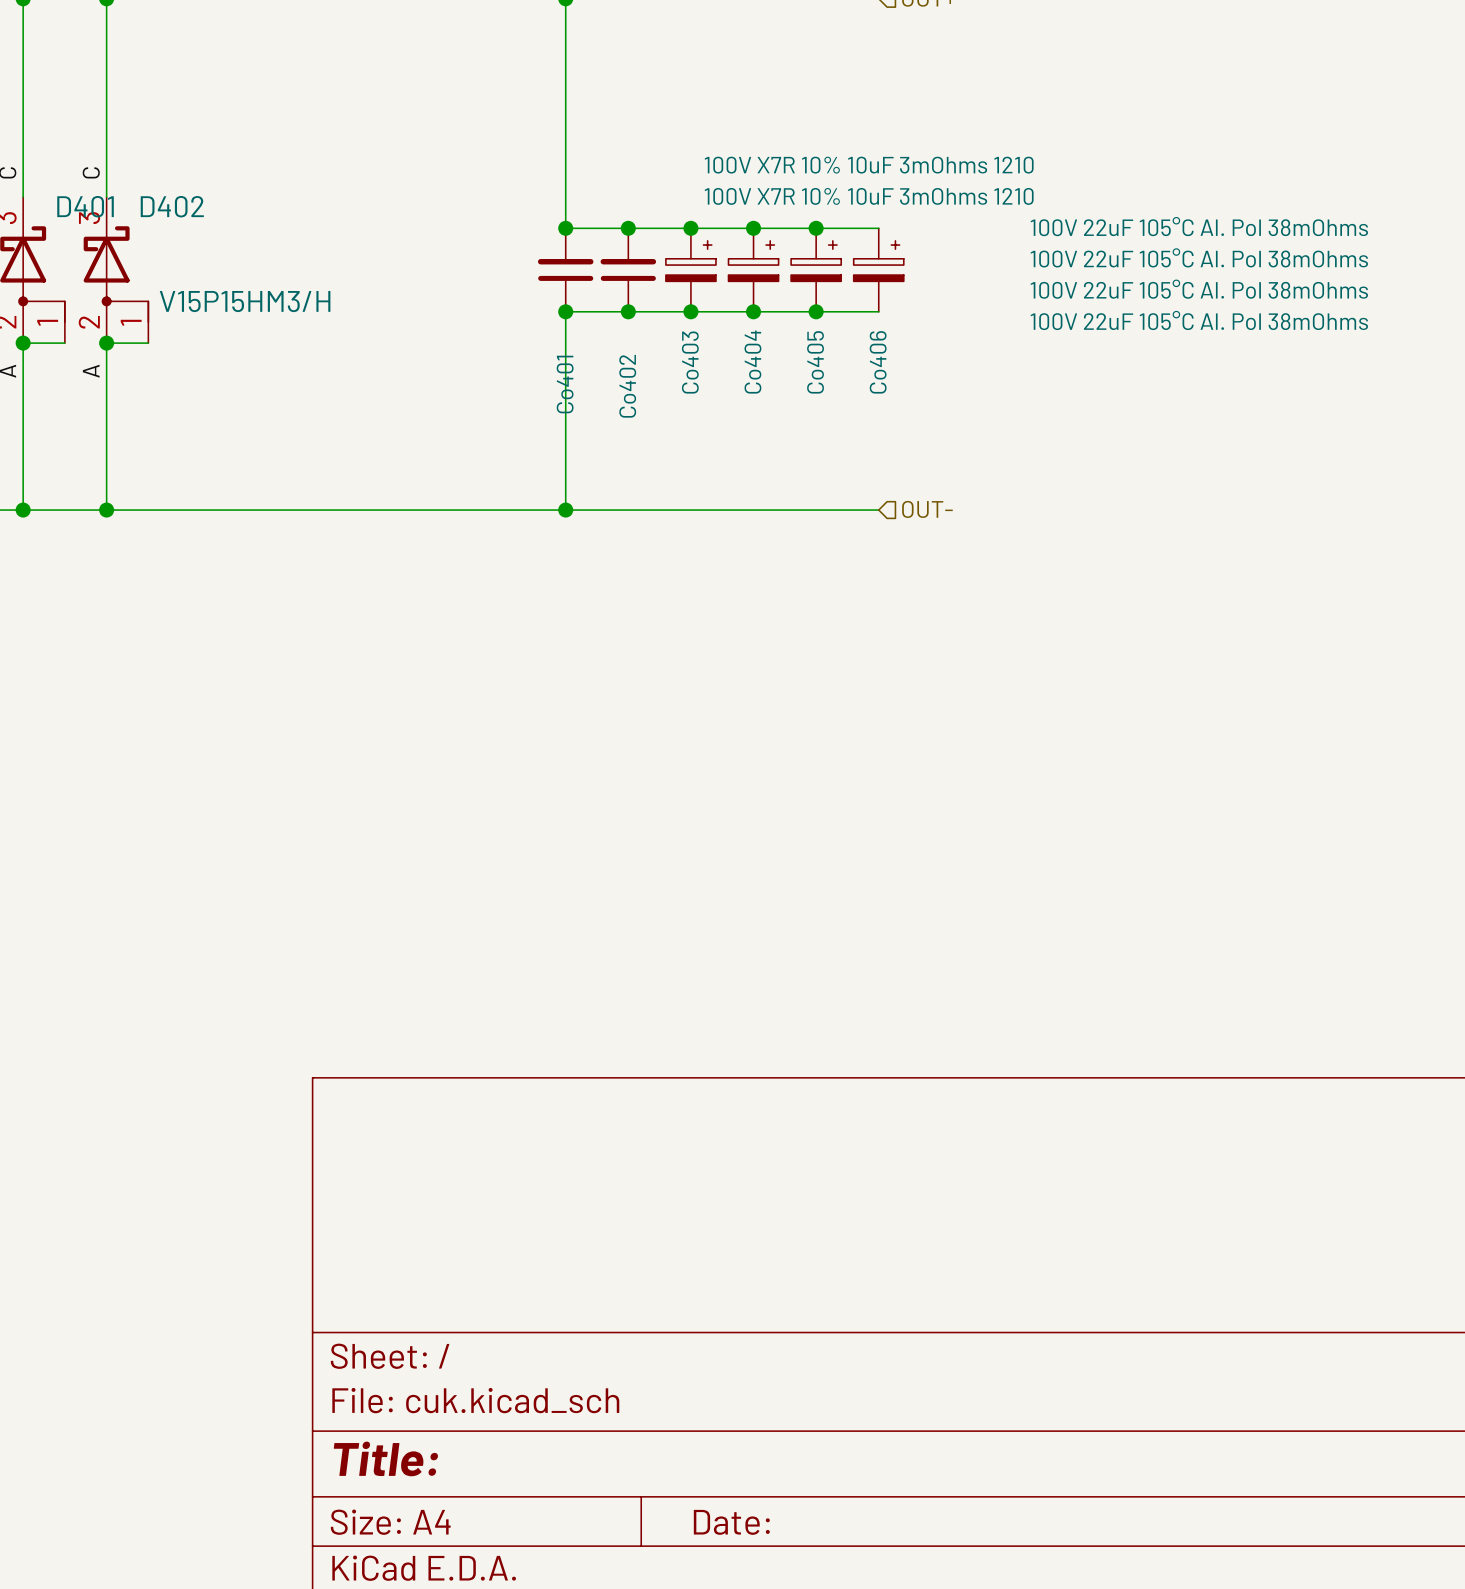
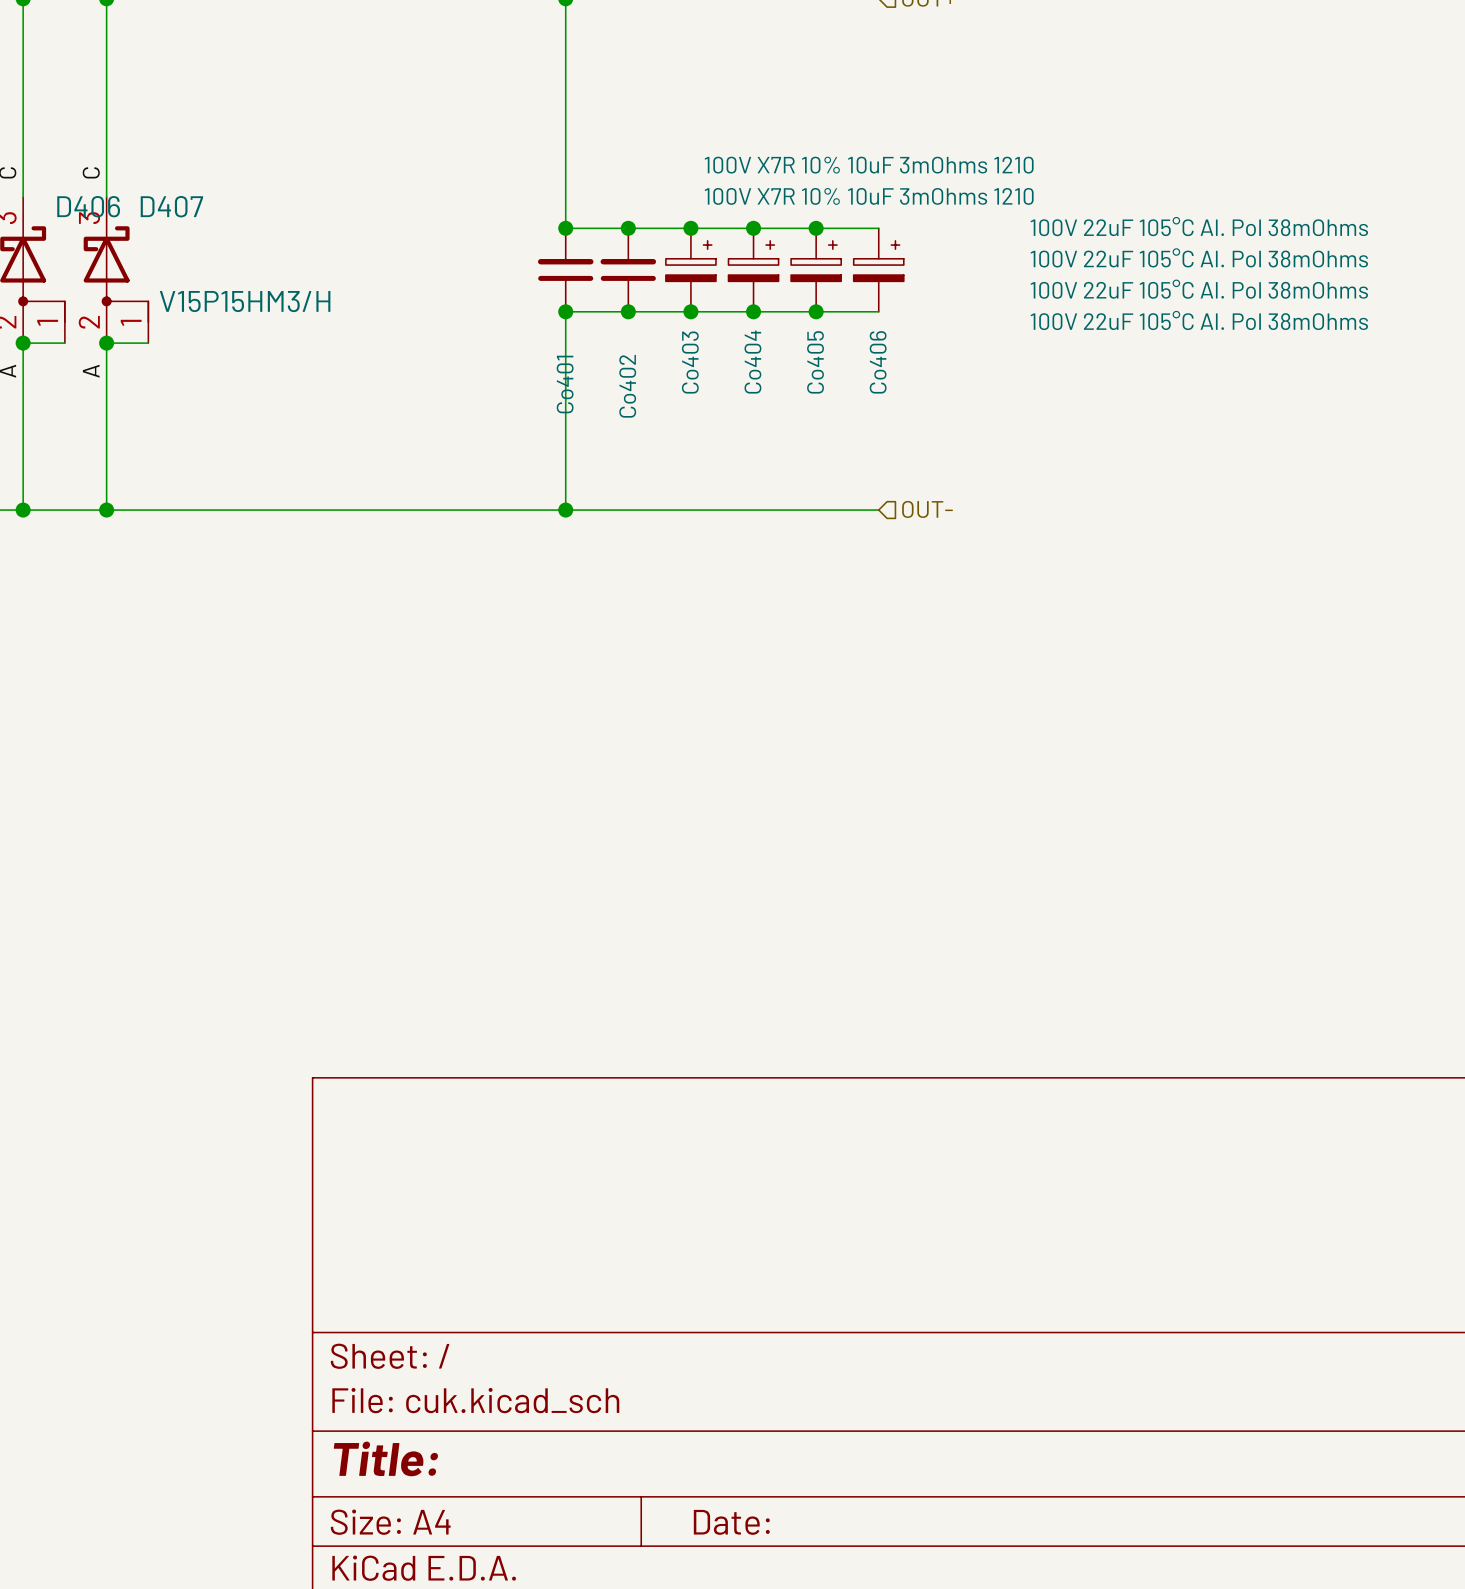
D401 name: D401 (85, 206) -> D406 (88, 206)
D402 name: D402 (172, 206) -> D407 (171, 206)

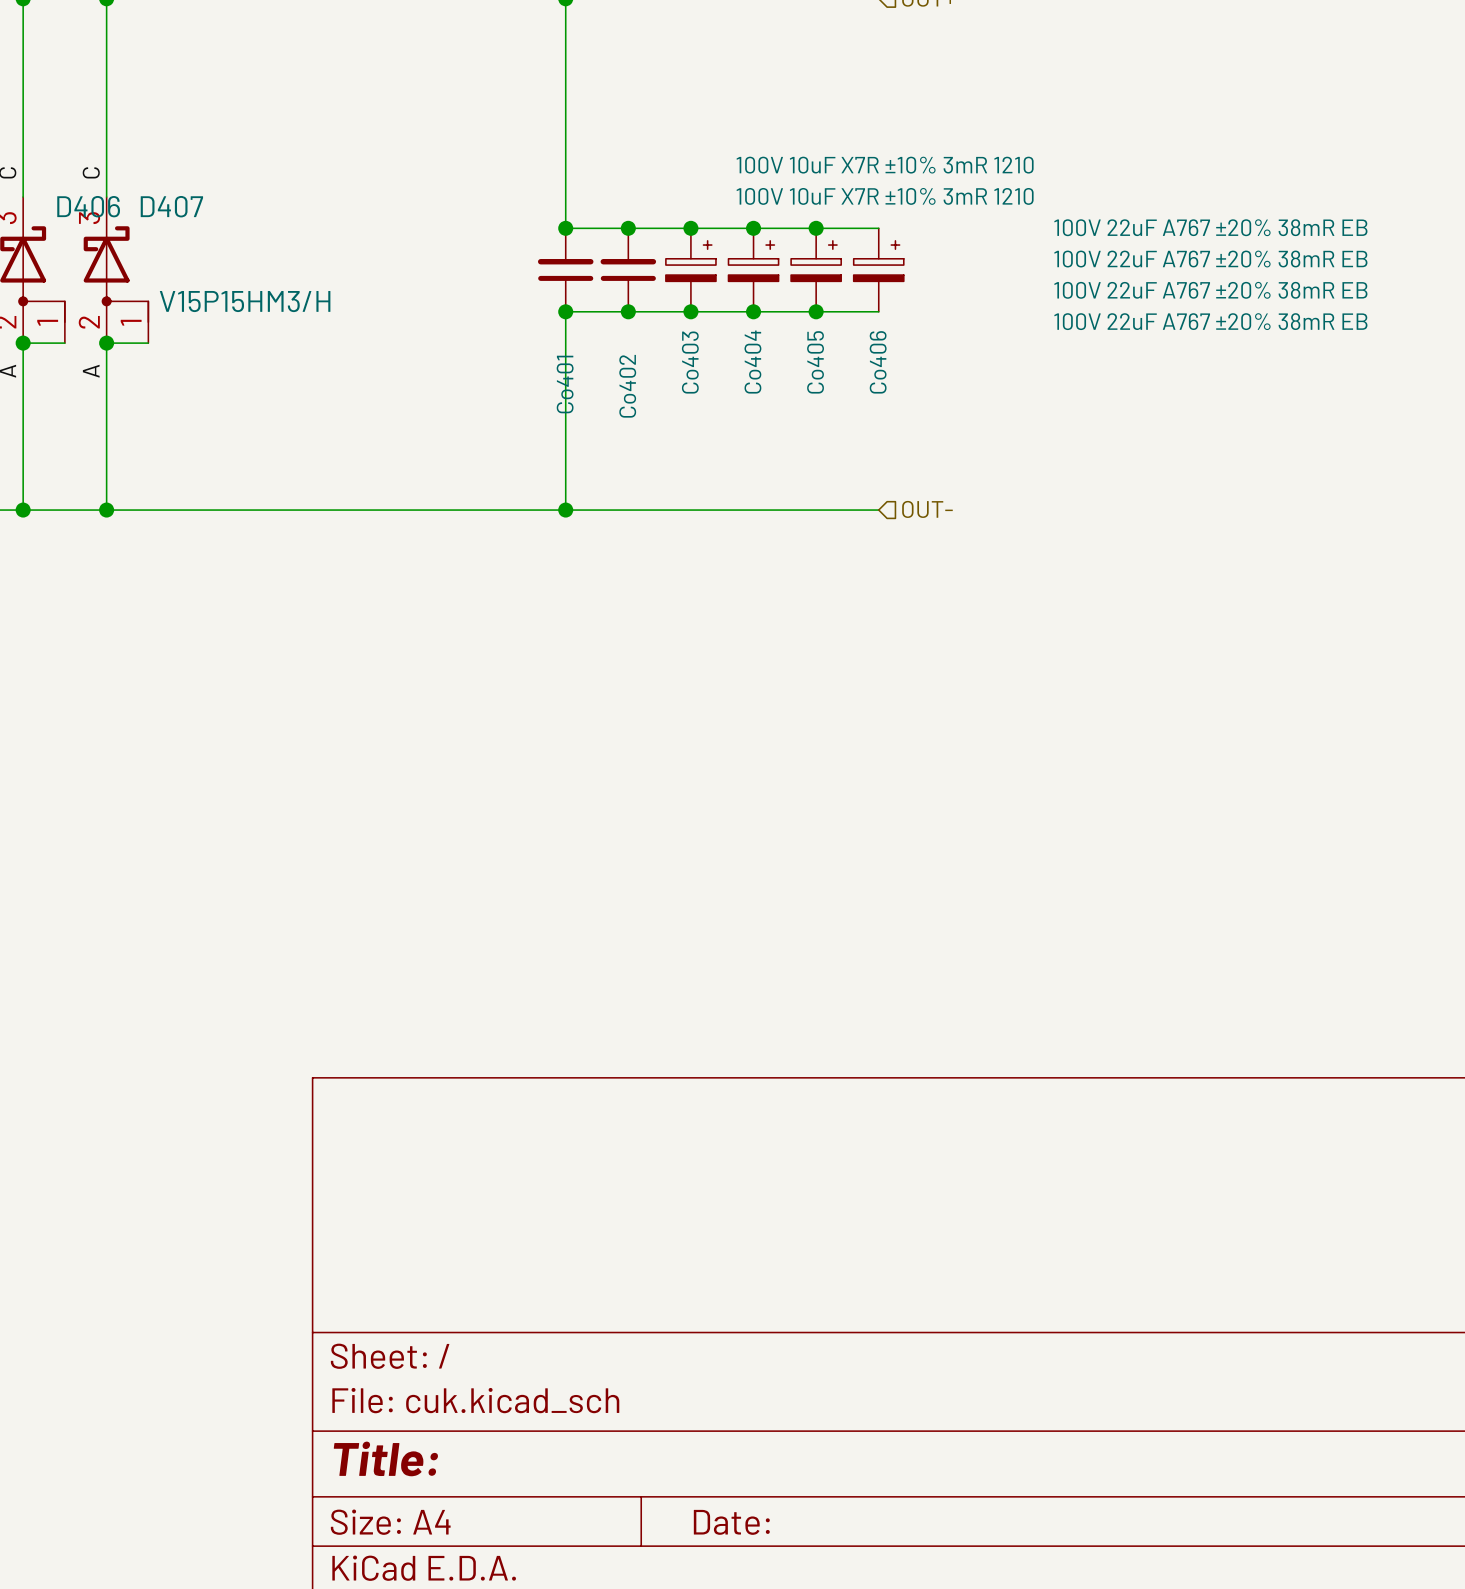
Co401 value: 100V X7R 10% 10uF 3mOhms 1210 (869, 165) -> 100V 10uF X7R ±10% 3mR 1210 (885, 165)
Co402 value: 100V X7R 10% 10uF 3mOhms 1210 (869, 196) -> 100V 10uF X7R ±10% 3mR 1210 (885, 196)
Co403 value: 100V 22uF 105°C Al. Pol 38mOhms (1199, 226) -> 100V 22uF A767 ±20% 38mR EB (1210, 227)
Co404 value: 100V 22uF 105°C Al. Pol 38mOhms (1199, 257) -> 100V 22uF A767 ±20% 38mR EB (1210, 259)
Co405 value: 100V 22uF 105°C Al. Pol 38mOhms (1199, 289) -> 100V 22uF A767 ±20% 38mR EB (1210, 290)
Co406 value: 100V 22uF 105°C Al. Pol 38mOhms (1199, 320) -> 100V 22uF A767 ±20% 38mR EB (1210, 321)

